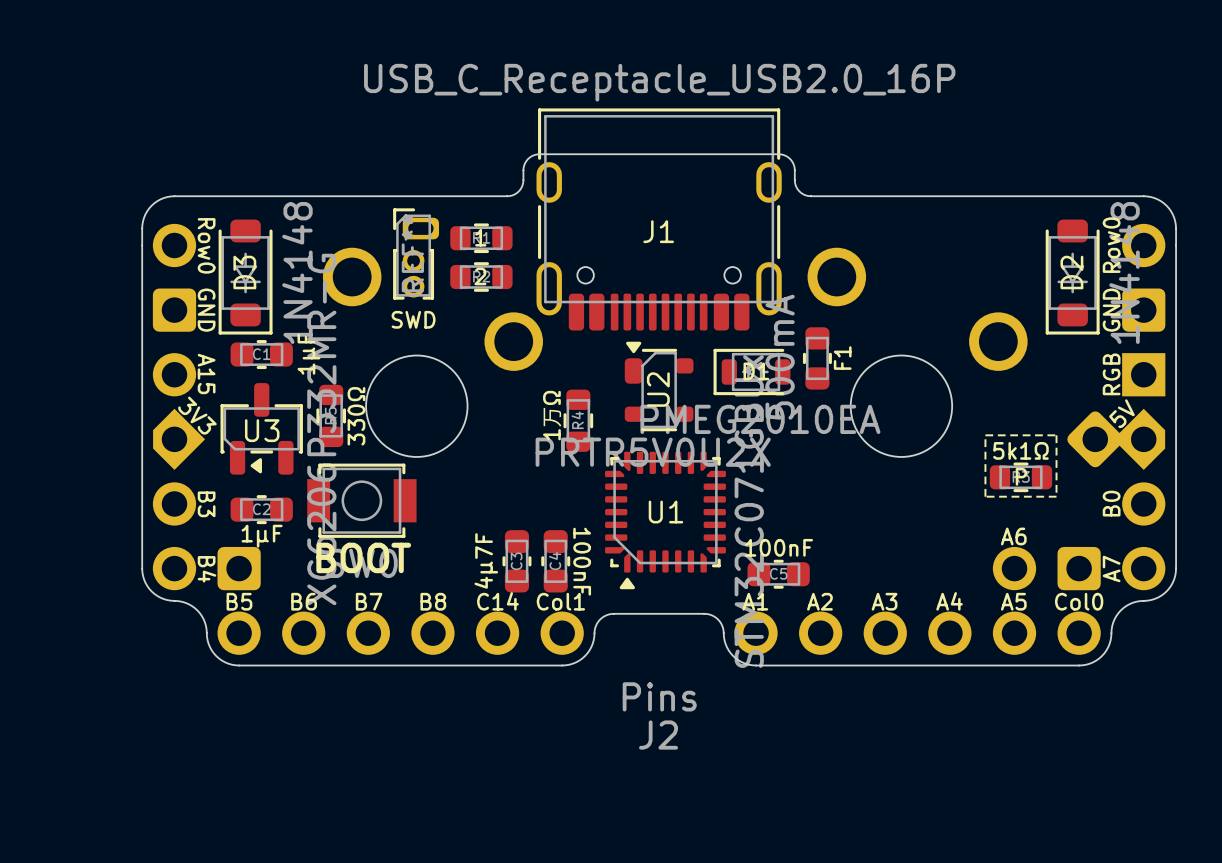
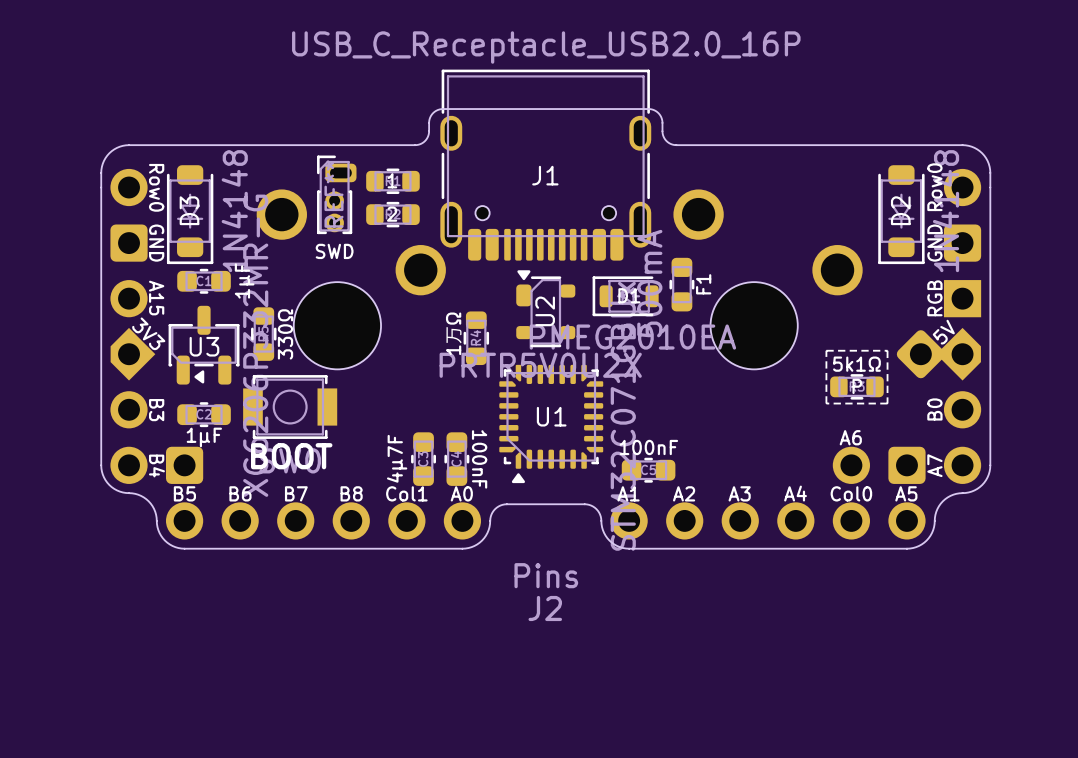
J2 text: C14 (497, 601) -> Col1 (406, 493)
J2 text: Col1 (560, 601) -> none
J2 text: none -> A0 (461, 493)
J2 text: A5 (1013, 601) -> Col0 (851, 493)
J2 text: Col0 (1079, 601) -> A5 (906, 493)

